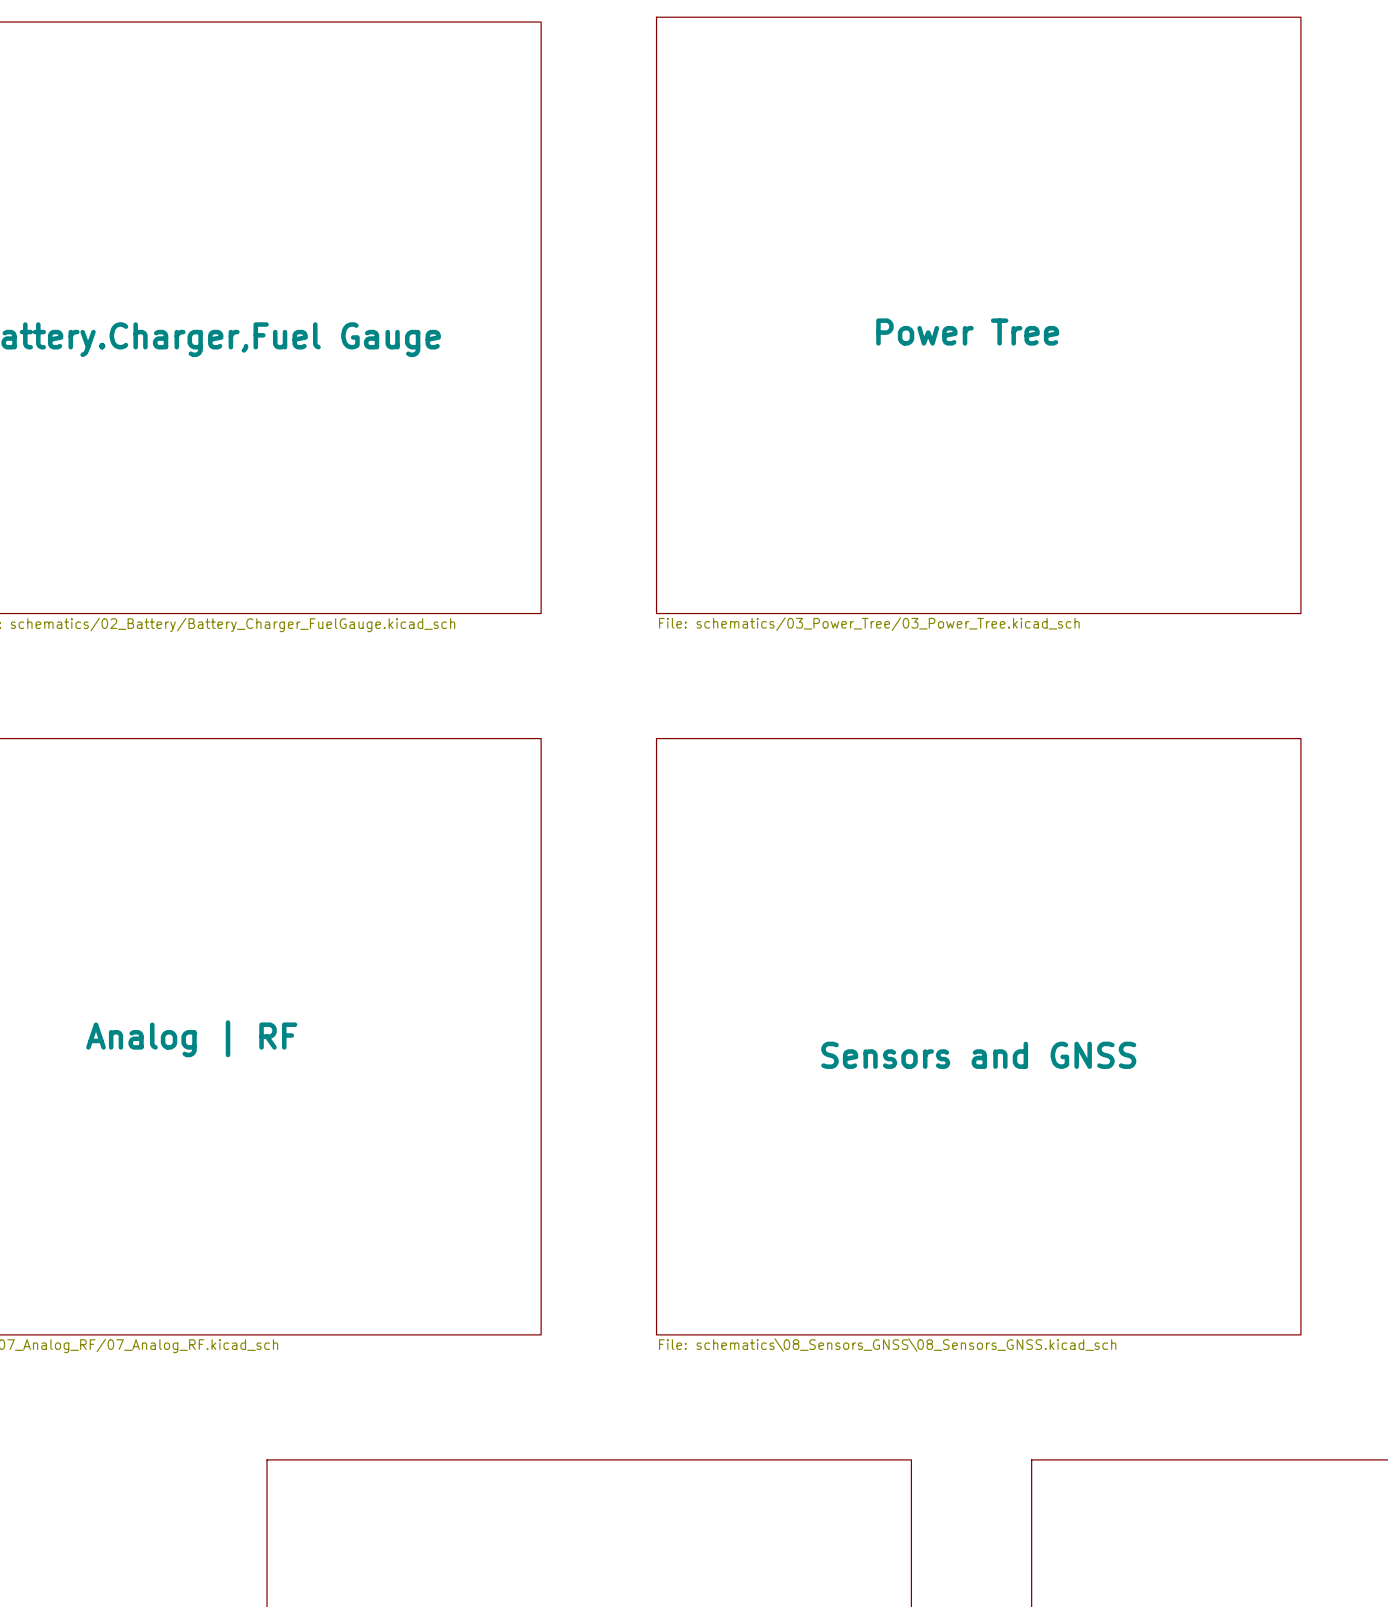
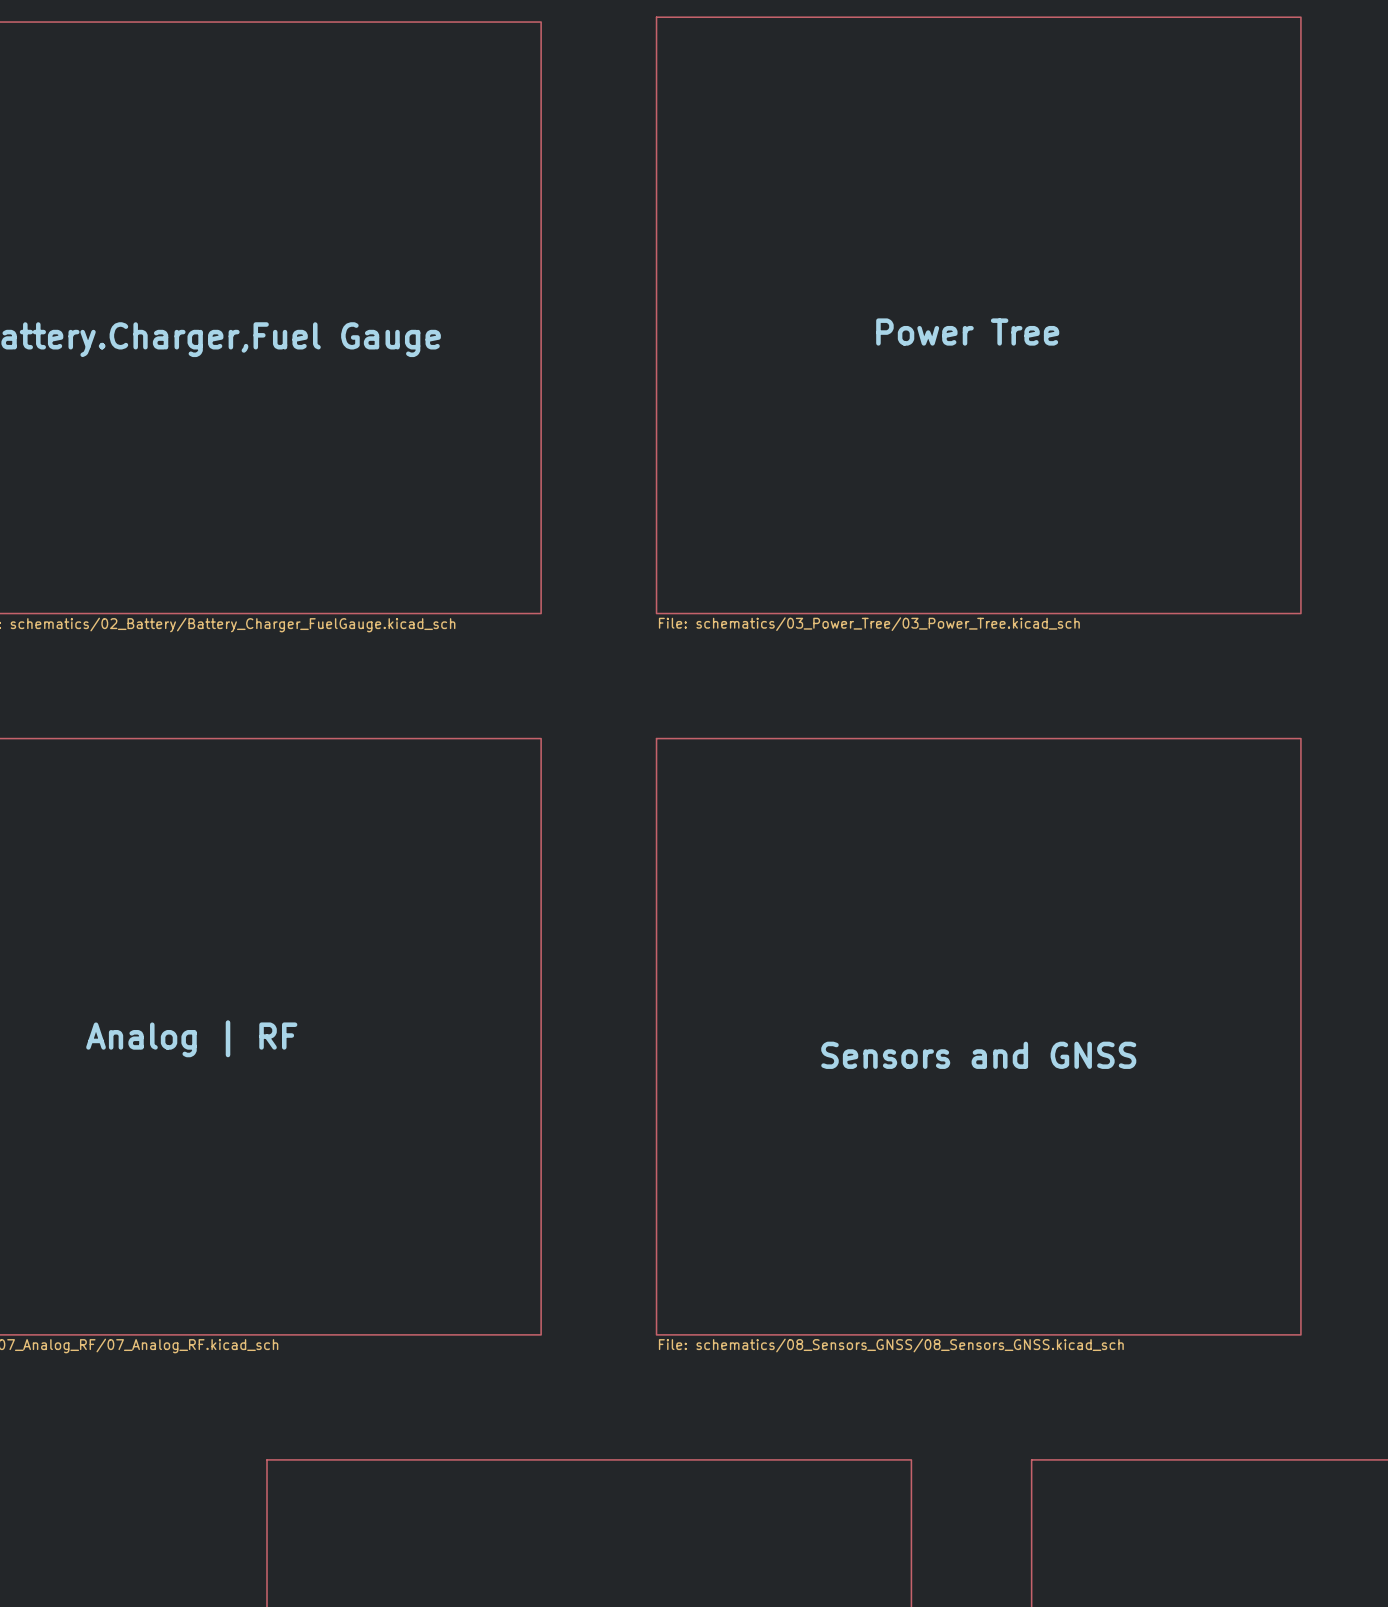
sheet Sensors and GNSS value: File: schematics\08_Sensors_GNSS\08_Sensors_GNSS.kicad_sch (887, 1345) -> File: schematics/08_Sensors_GNSS/08_Sensors_GNSS.kicad_sch (891, 1345)

